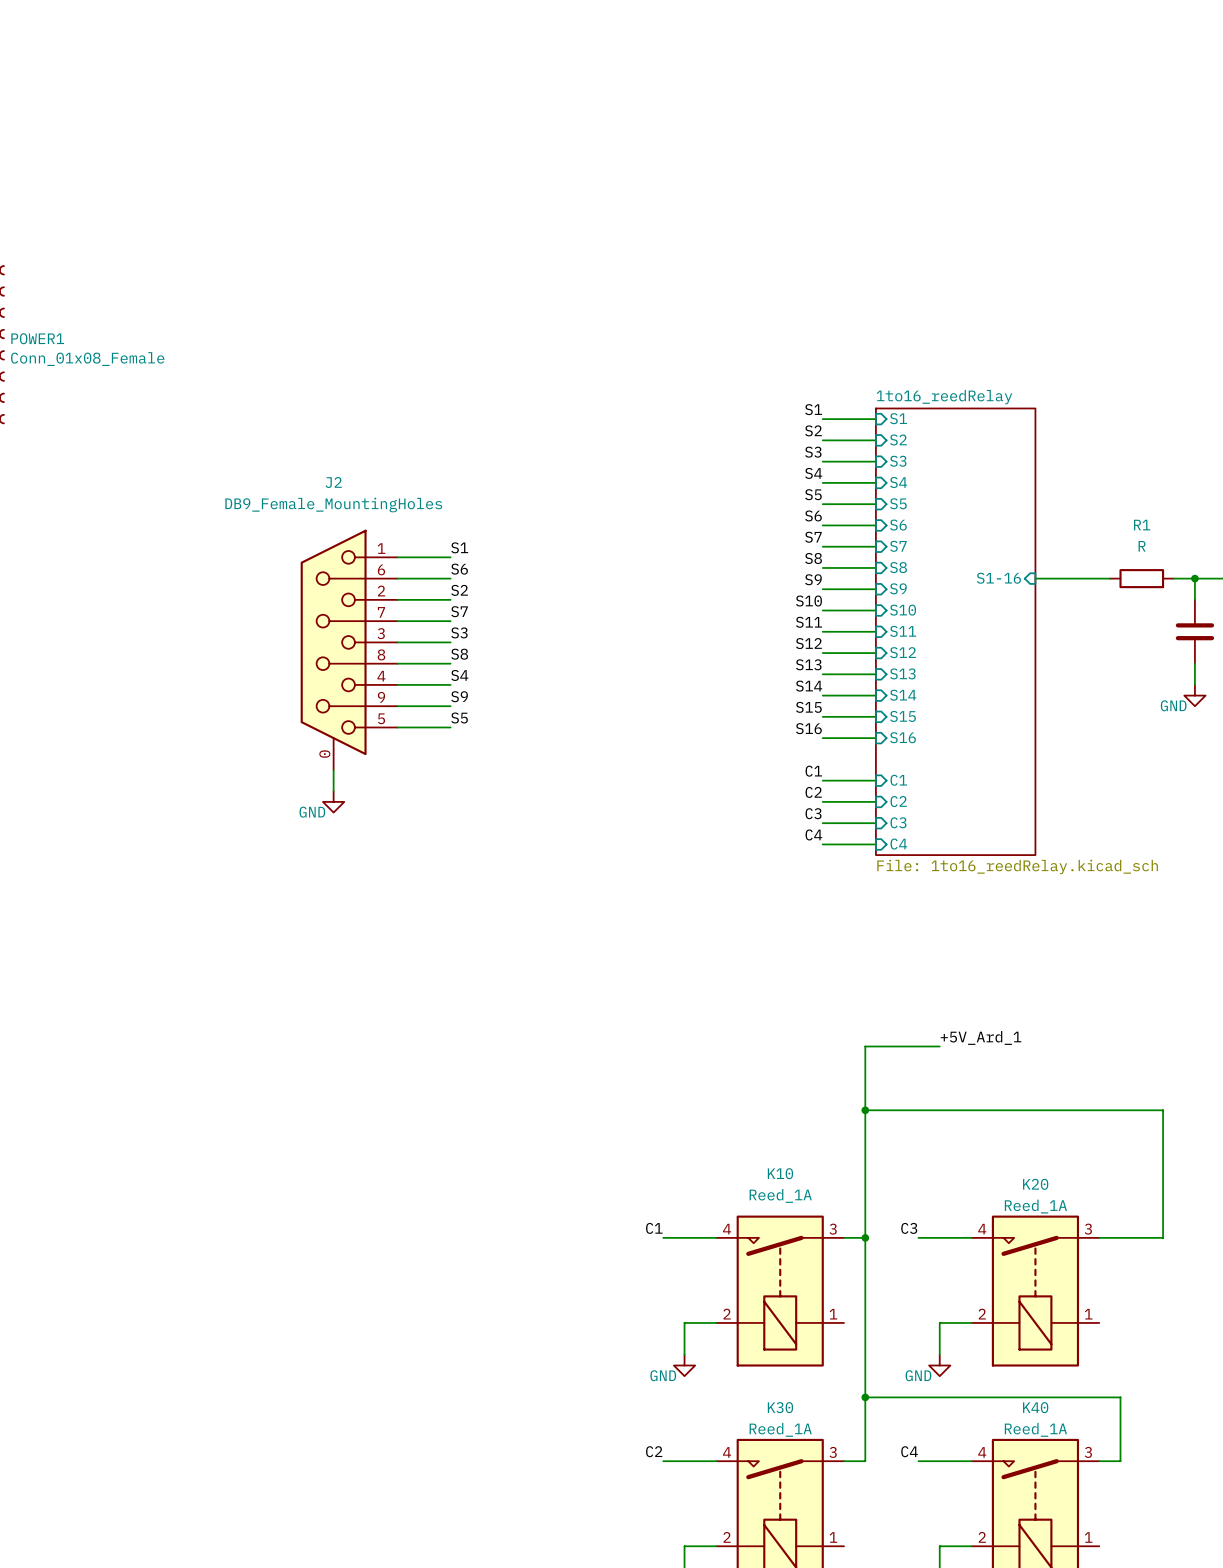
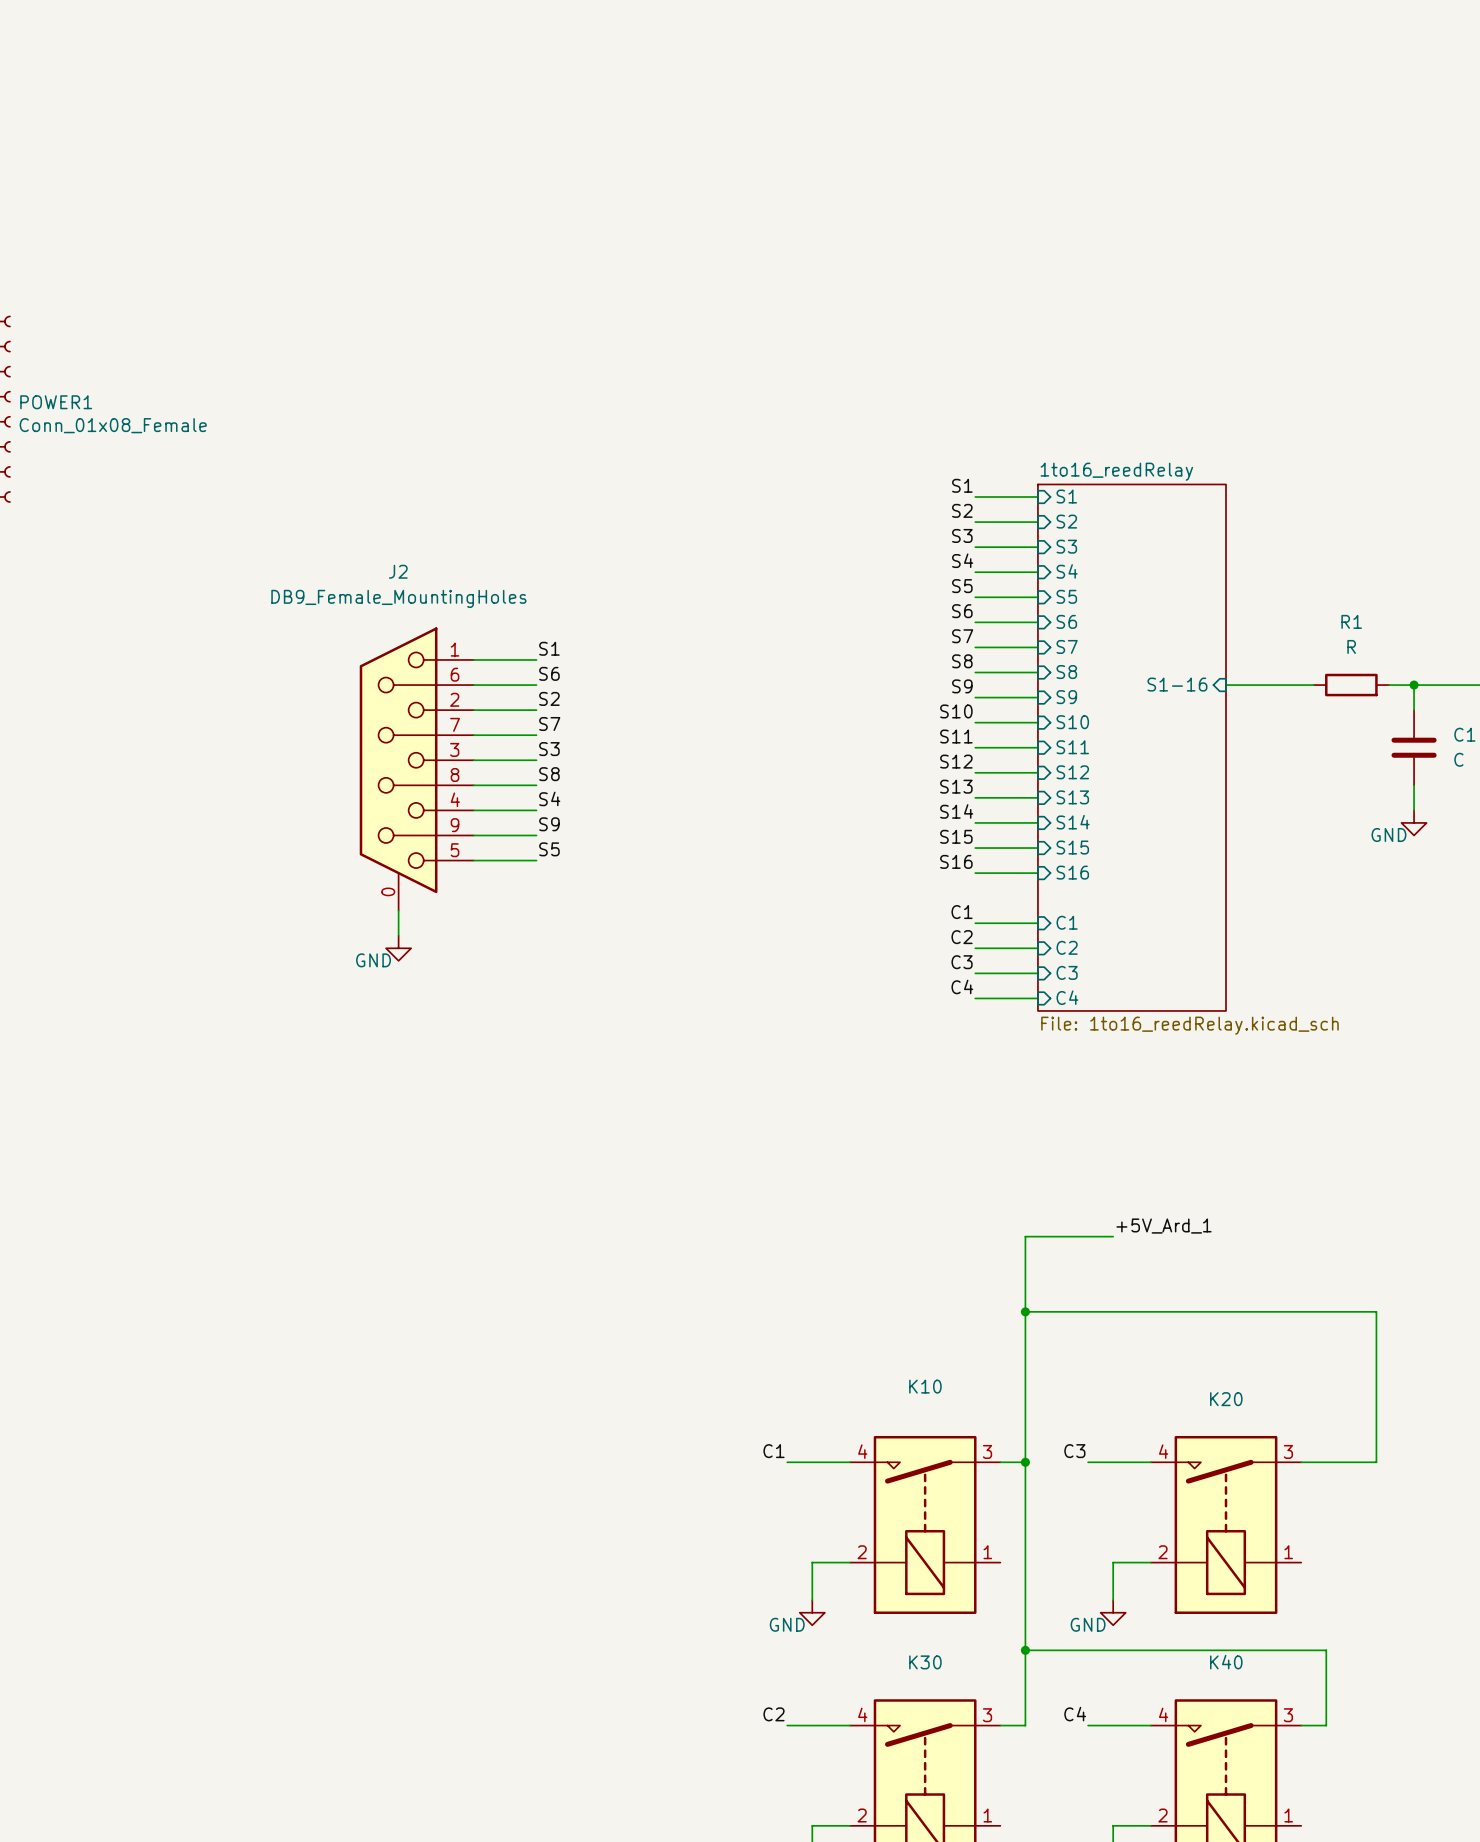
K10 value: Reed_1A (780, 1195) -> none
K20 value: Reed_1A (1035, 1206) -> none
K30 value: Reed_1A (780, 1429) -> none
K40 value: Reed_1A (1035, 1429) -> none

